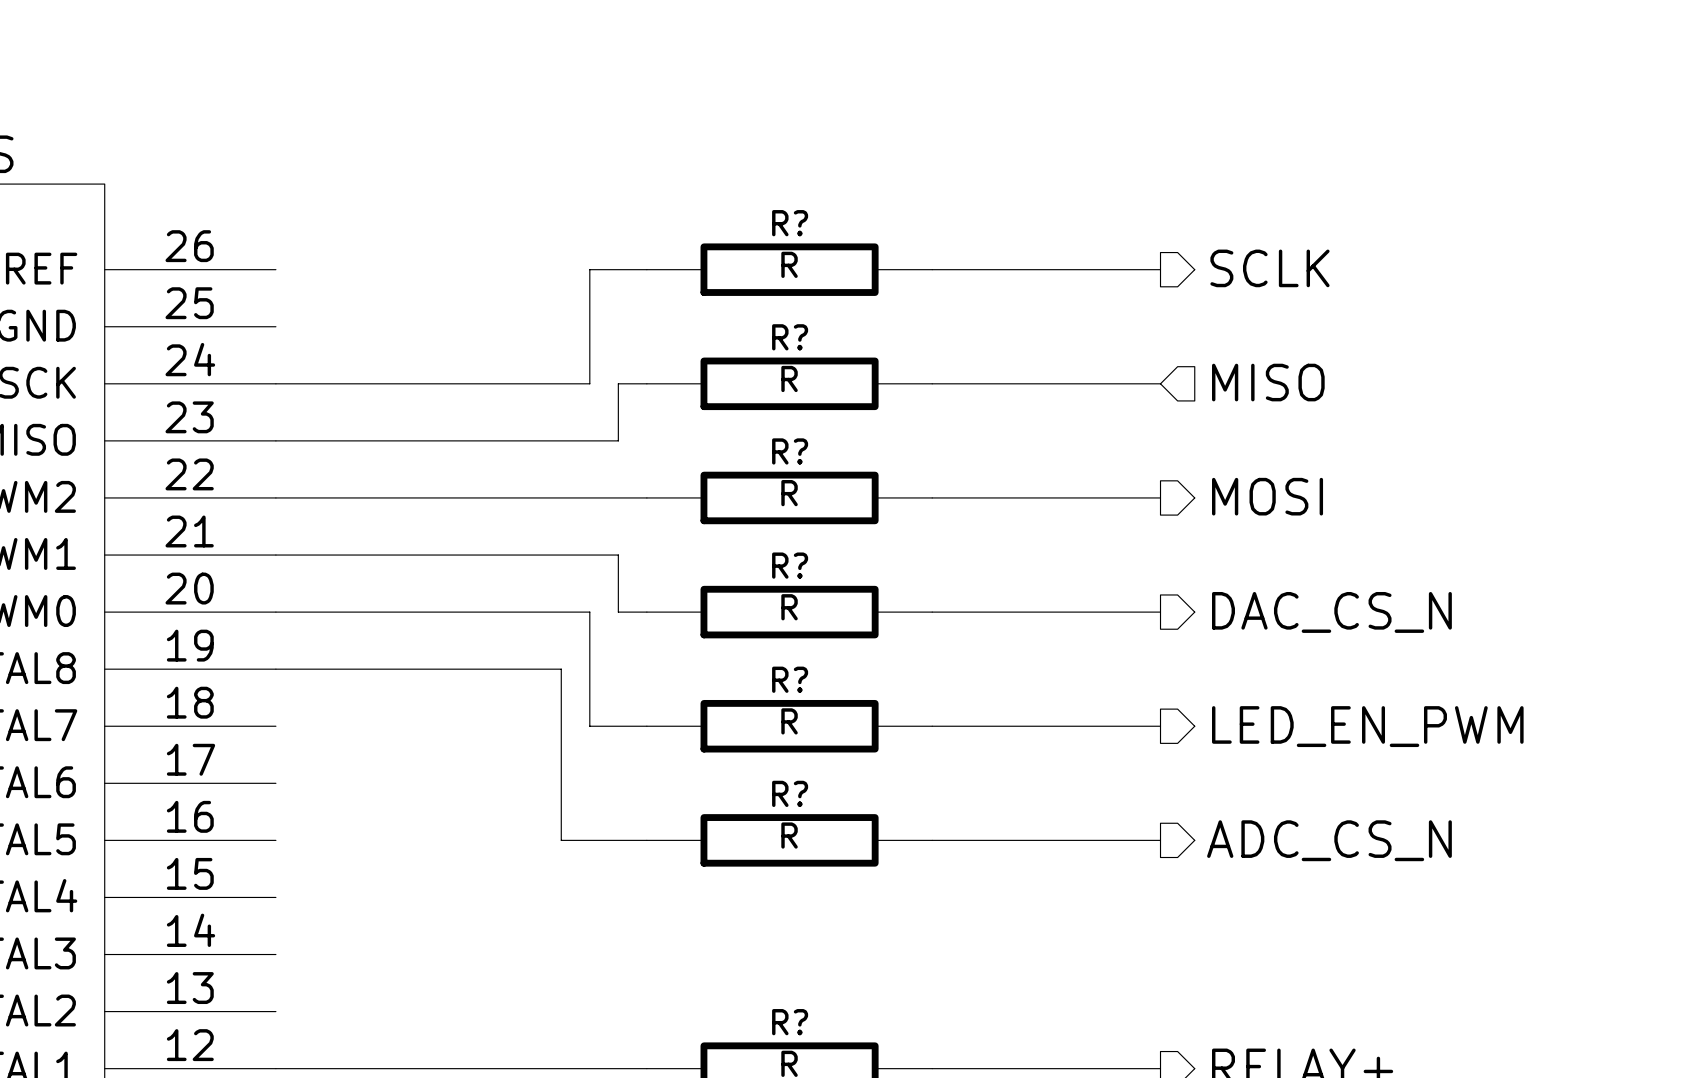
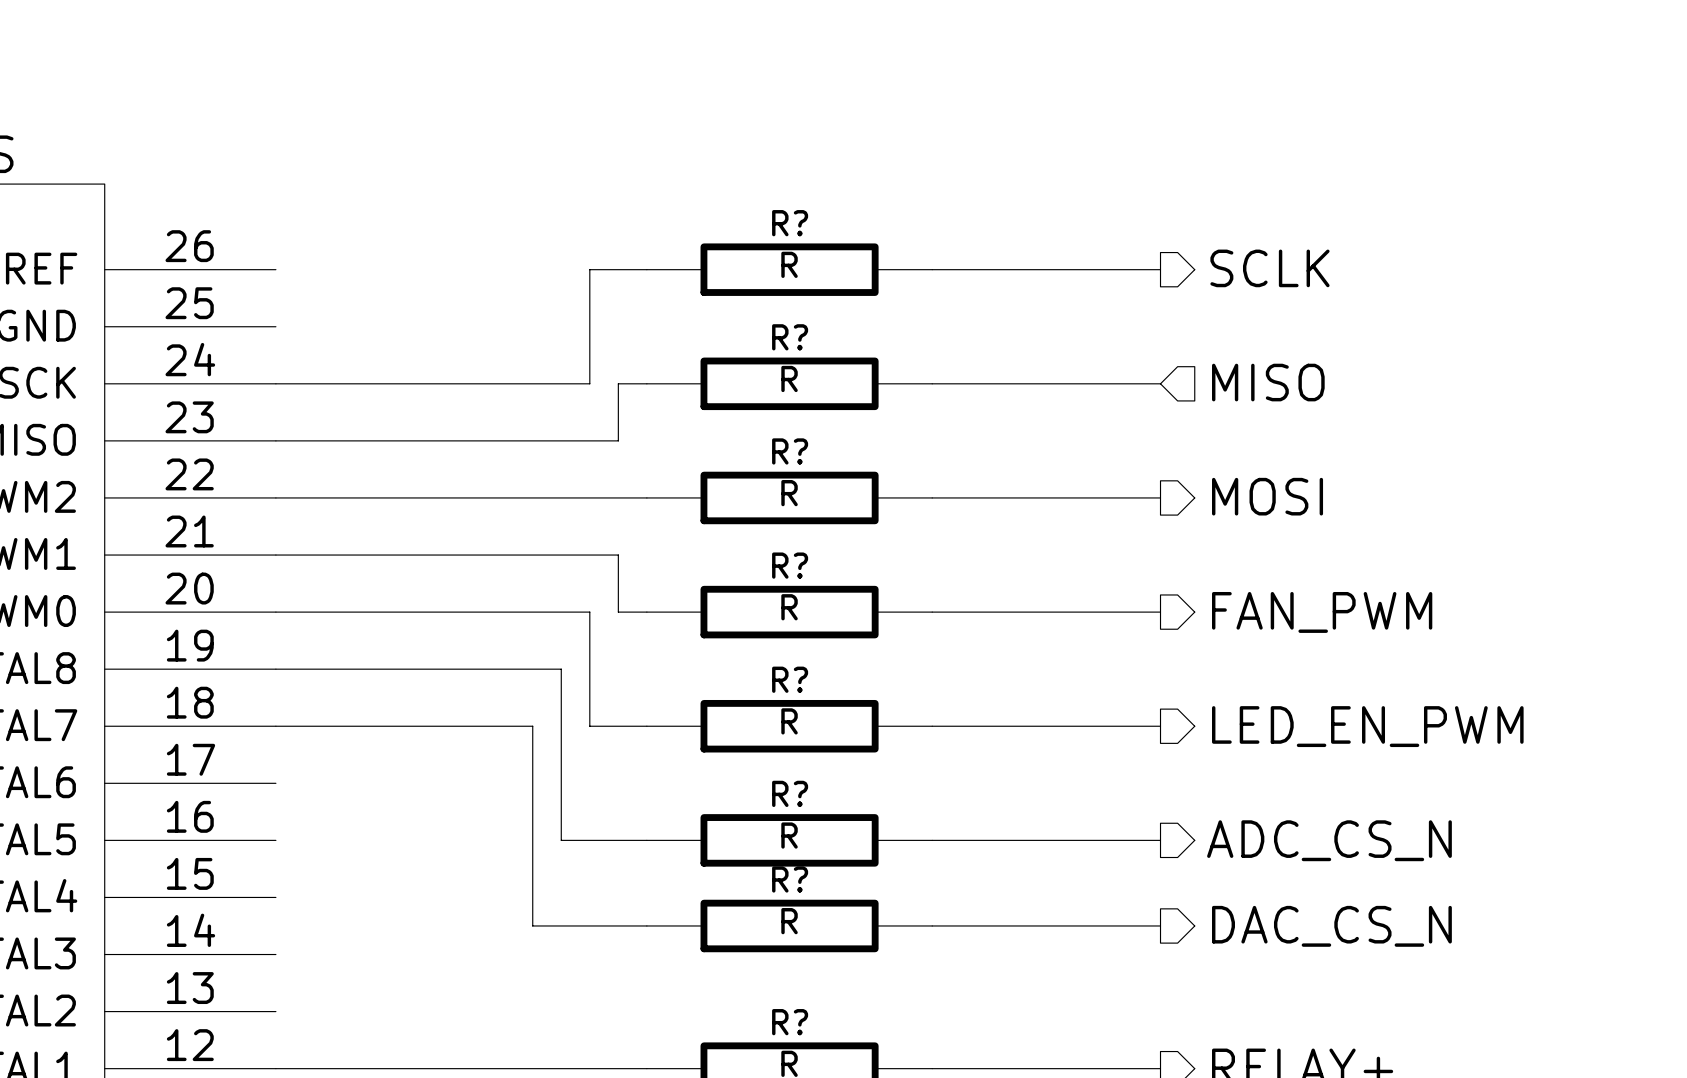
hierarchical label: DAC_CS_N (1331, 612) -> FAN_PWM (1322, 612)
wire: none -> (275, 726) (532, 726) (532, 925) (646, 925)
R?: none -> R (789, 925)
wire: none -> (932, 925) (1160, 925)
hierarchical label: none -> DAC_CS_N (1331, 926)

